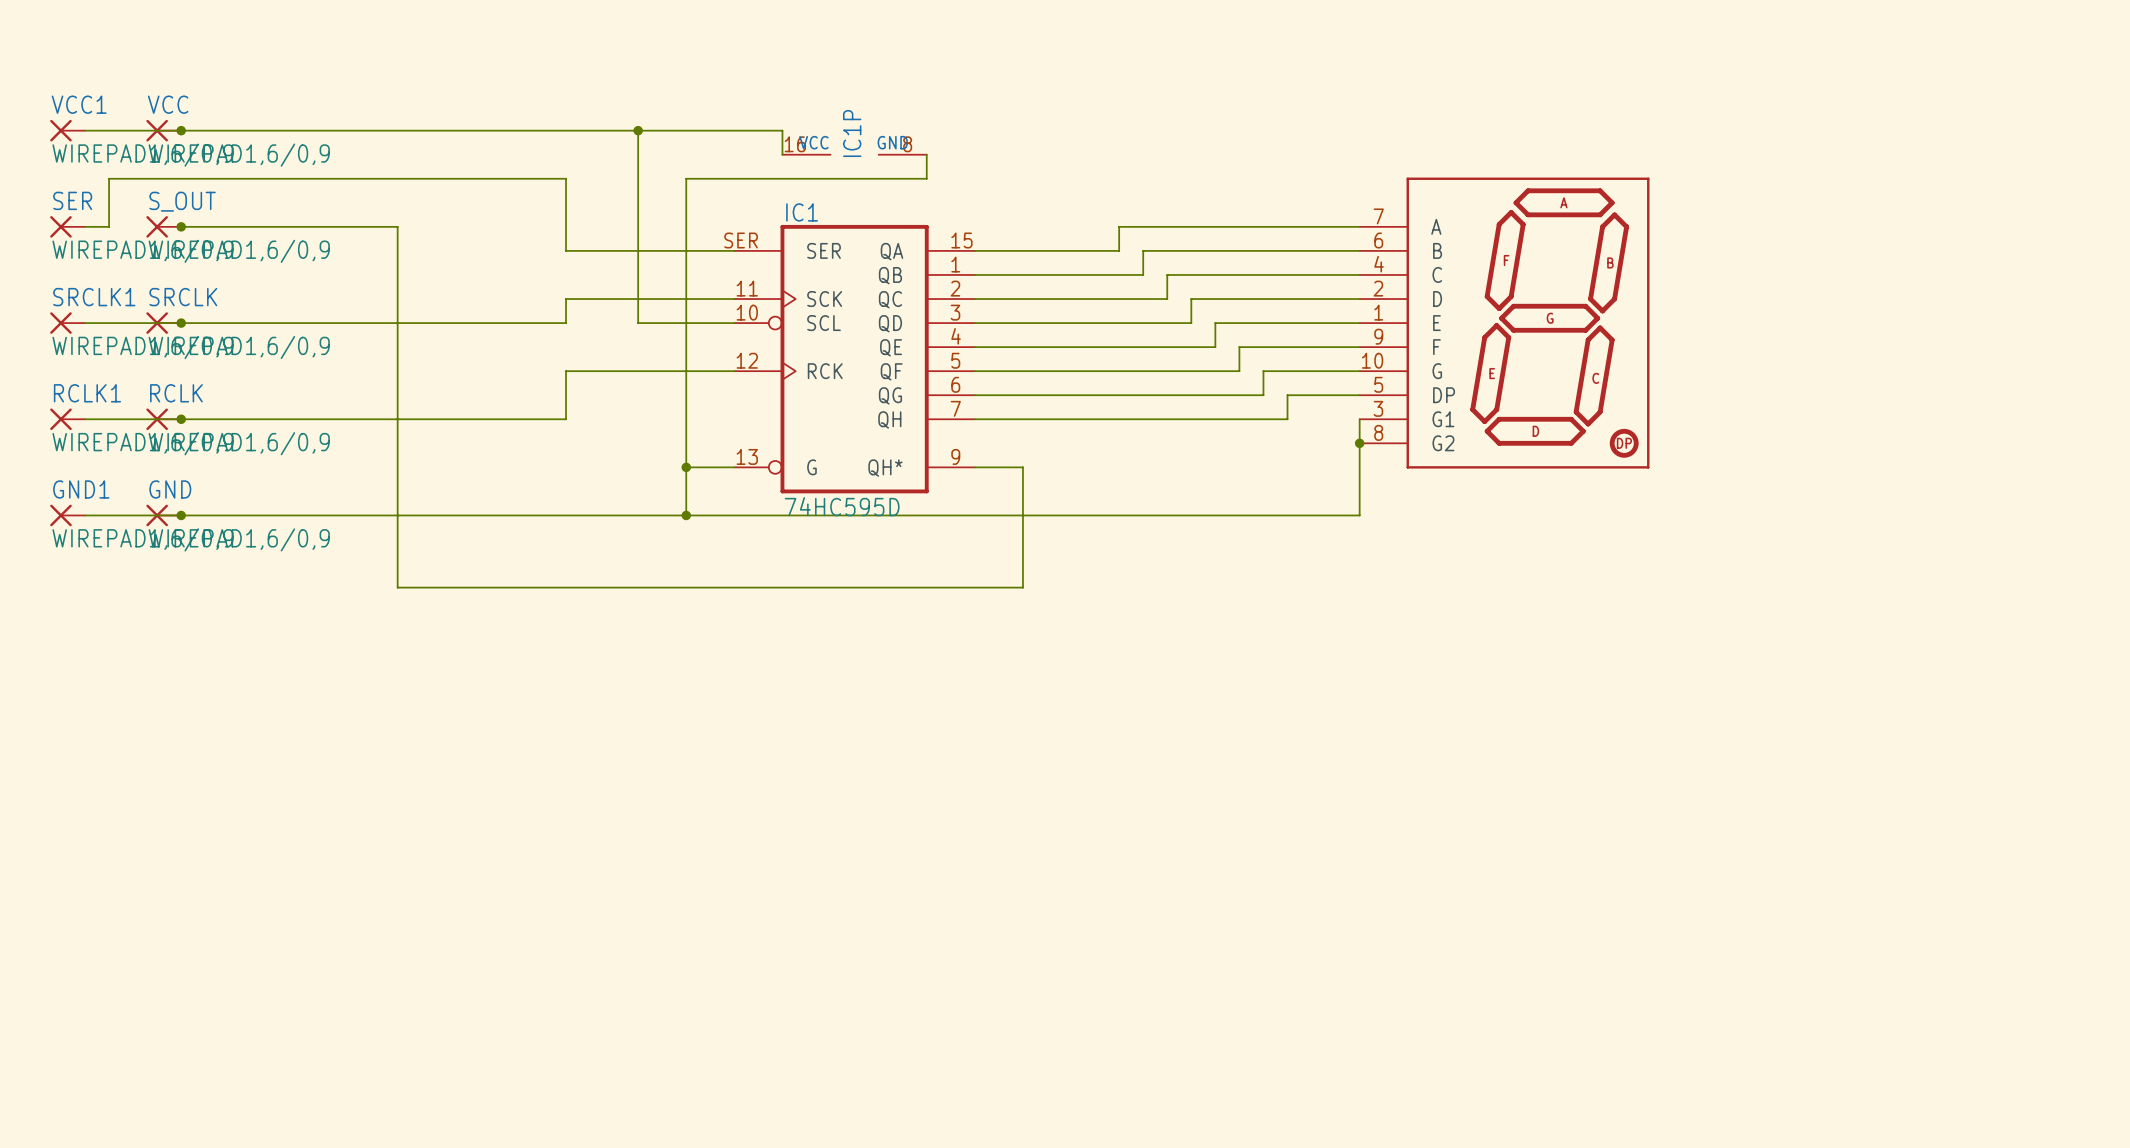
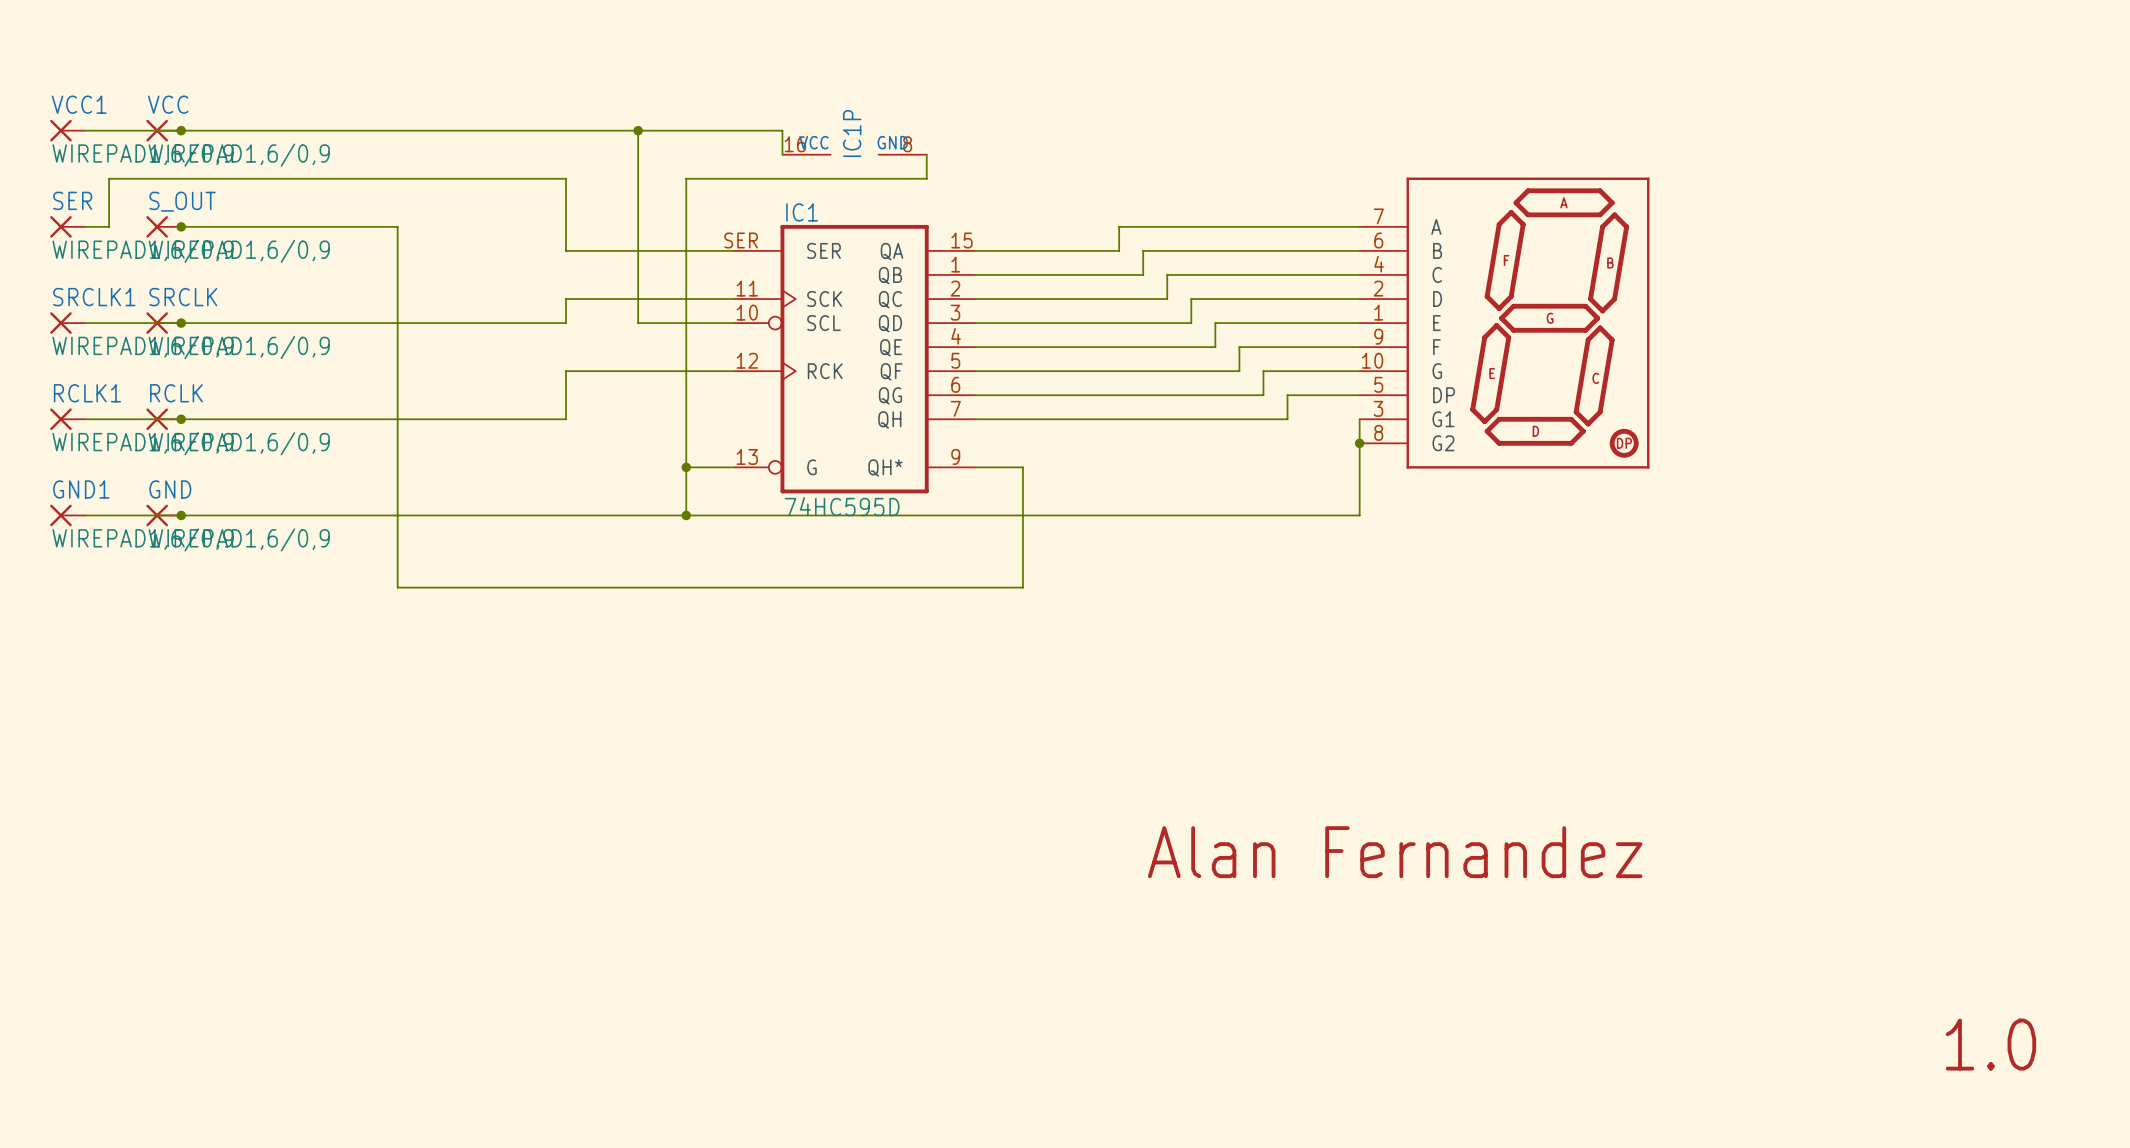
text: none -> Alan Fernandez (1395, 852)
text: none -> 1.0 (1990, 1044)

